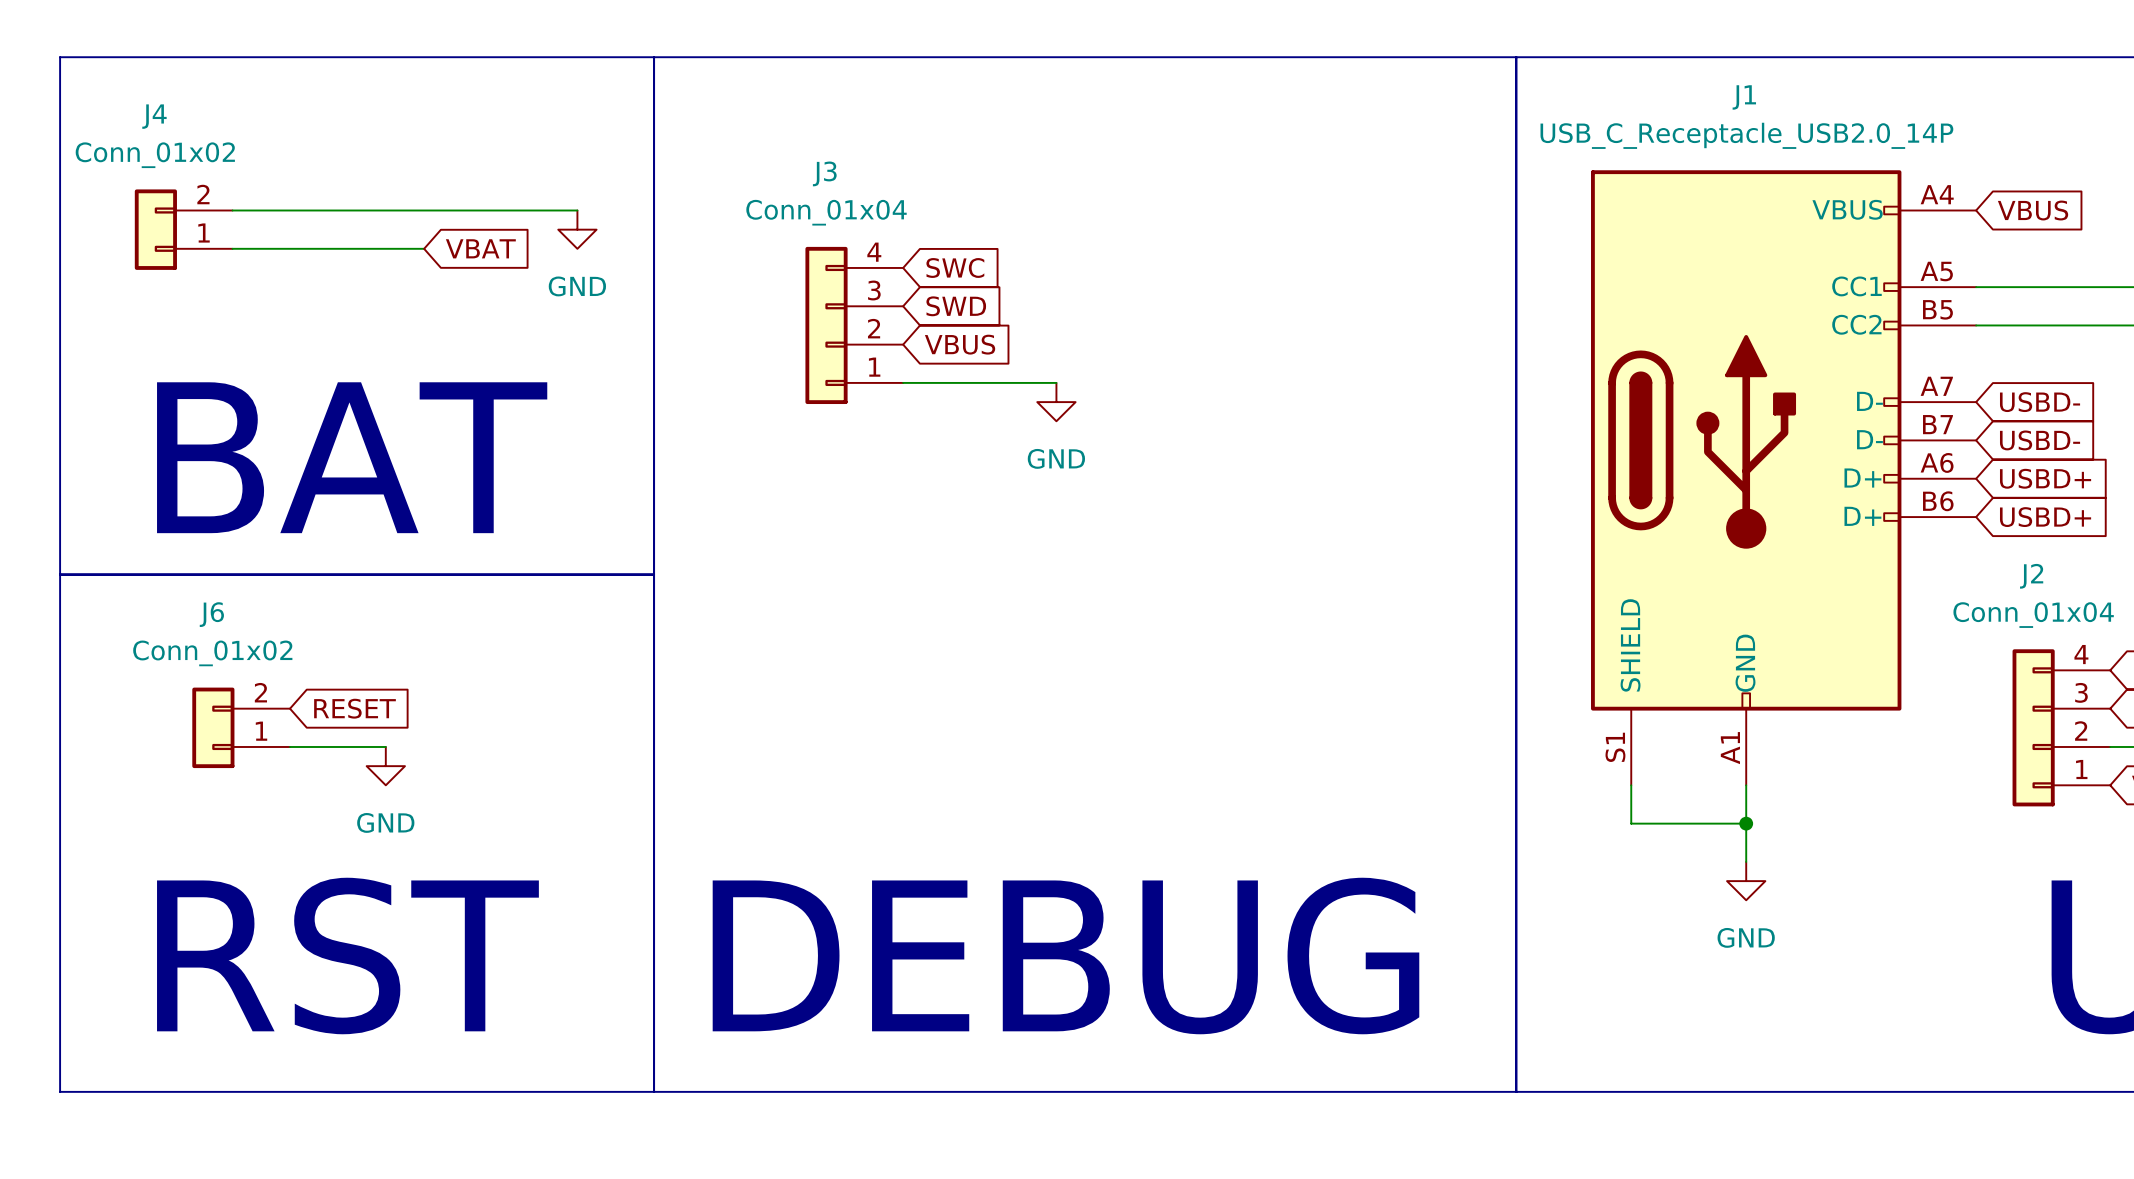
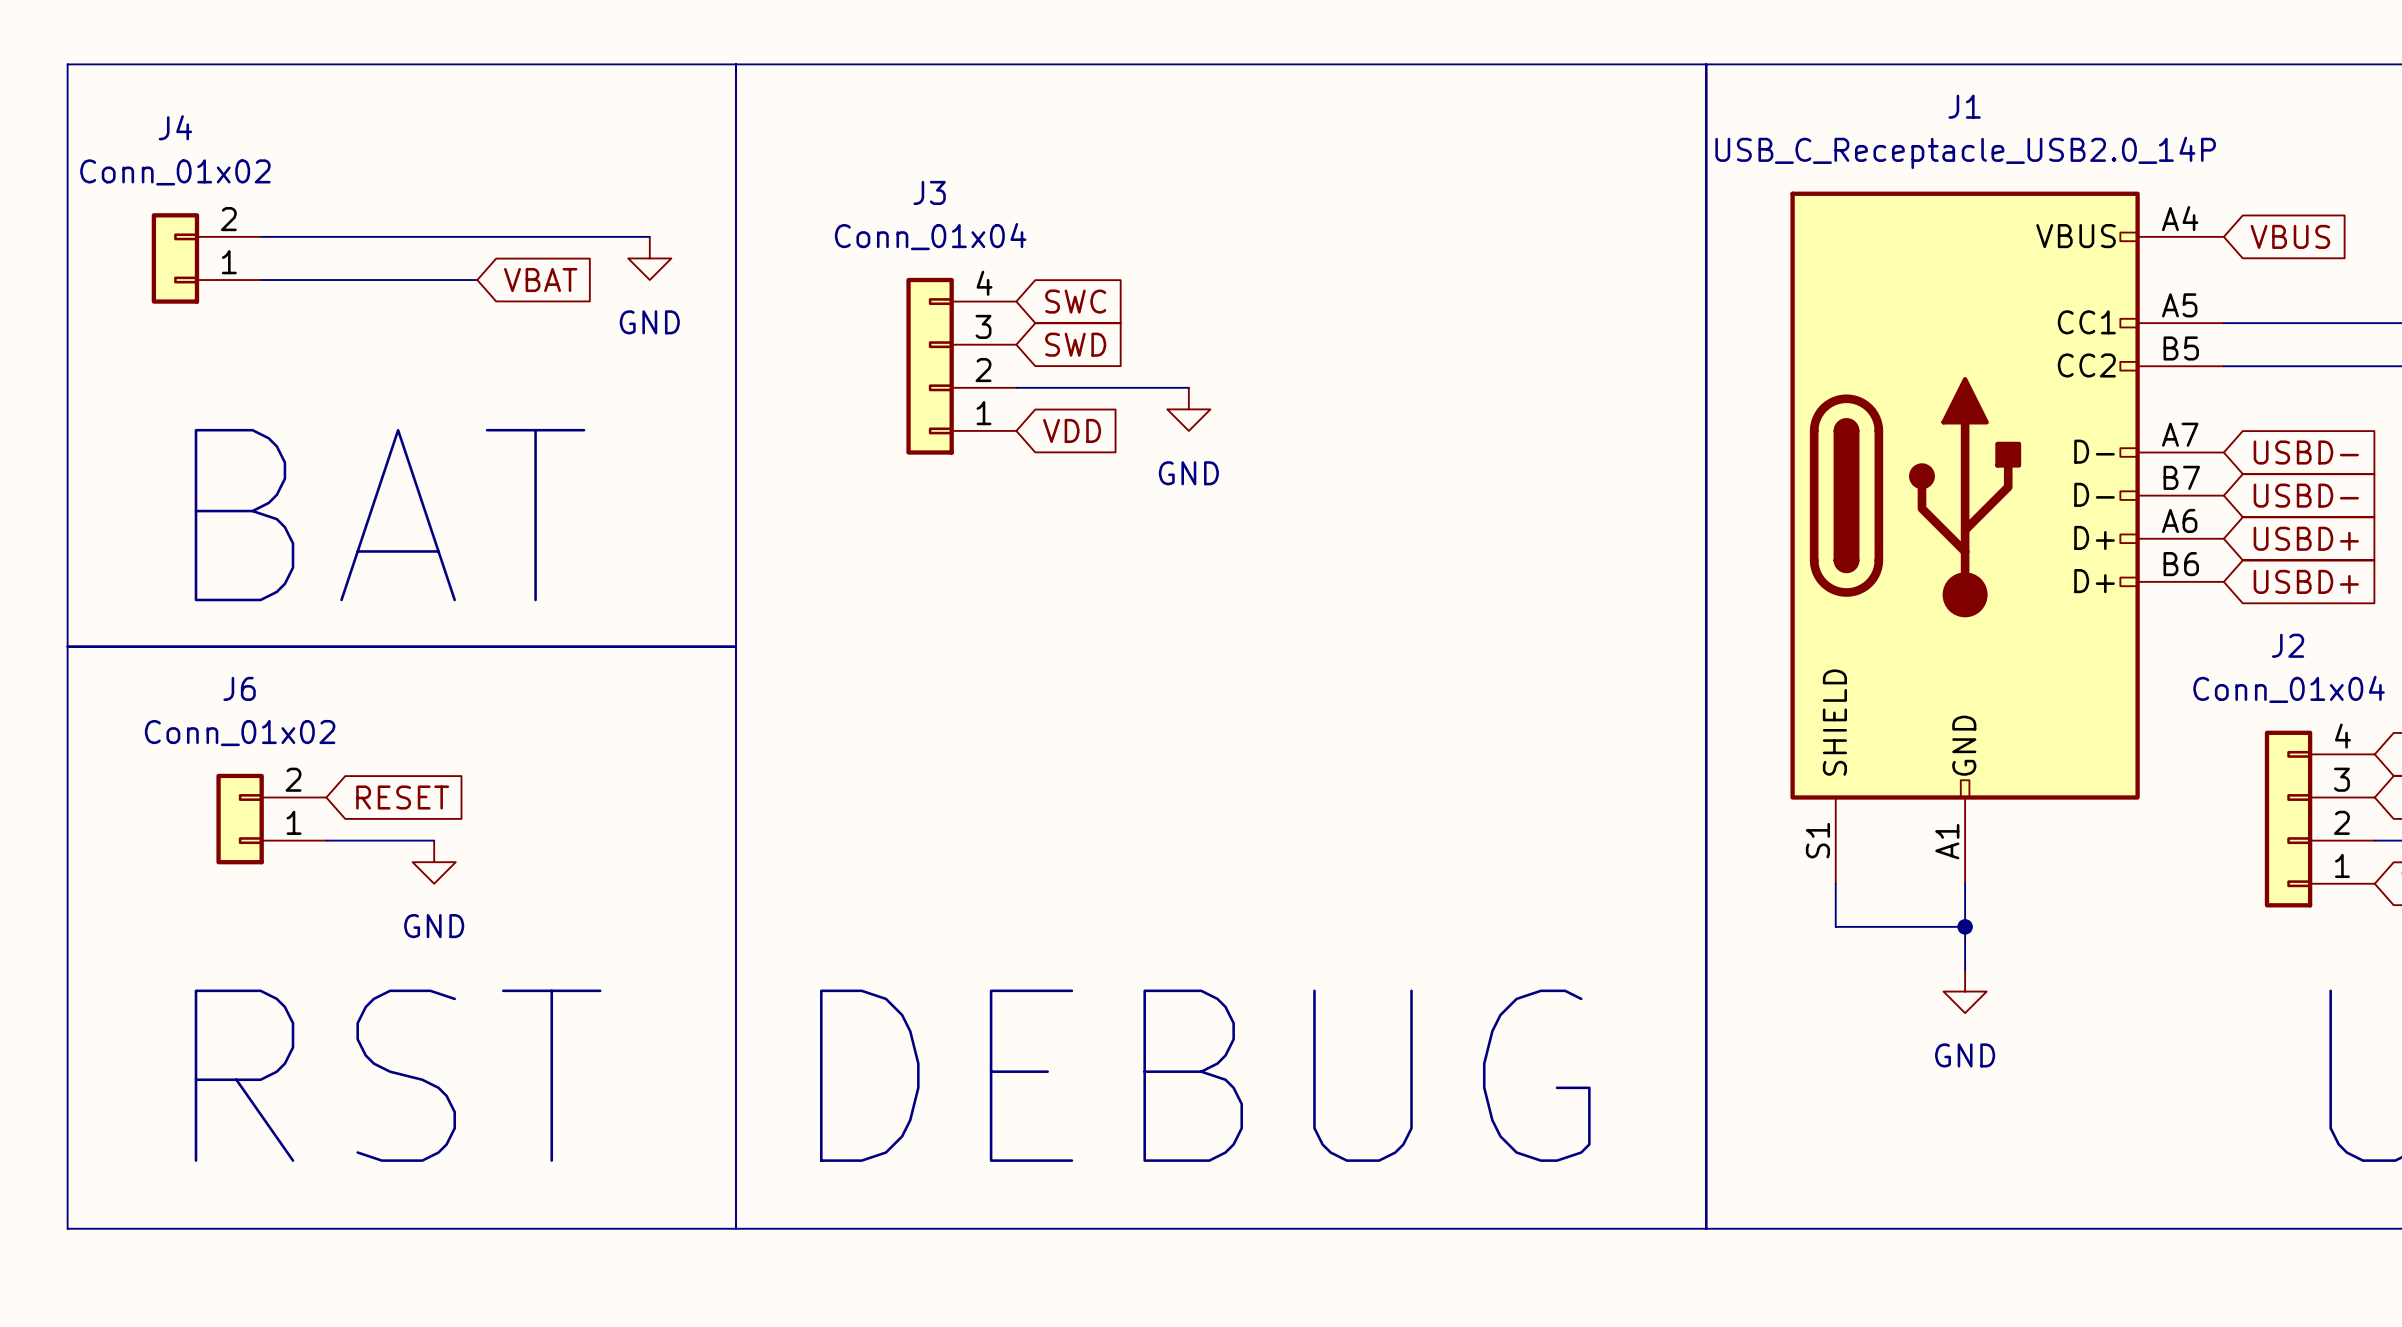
global label: VBUS (960, 344) -> none
wire: (903, 382) (1056, 382) -> (1016, 387) (1188, 387)
global label: none -> VDD (1072, 430)
power symbol position: GND (1056, 402) -> GND (1188, 409)

